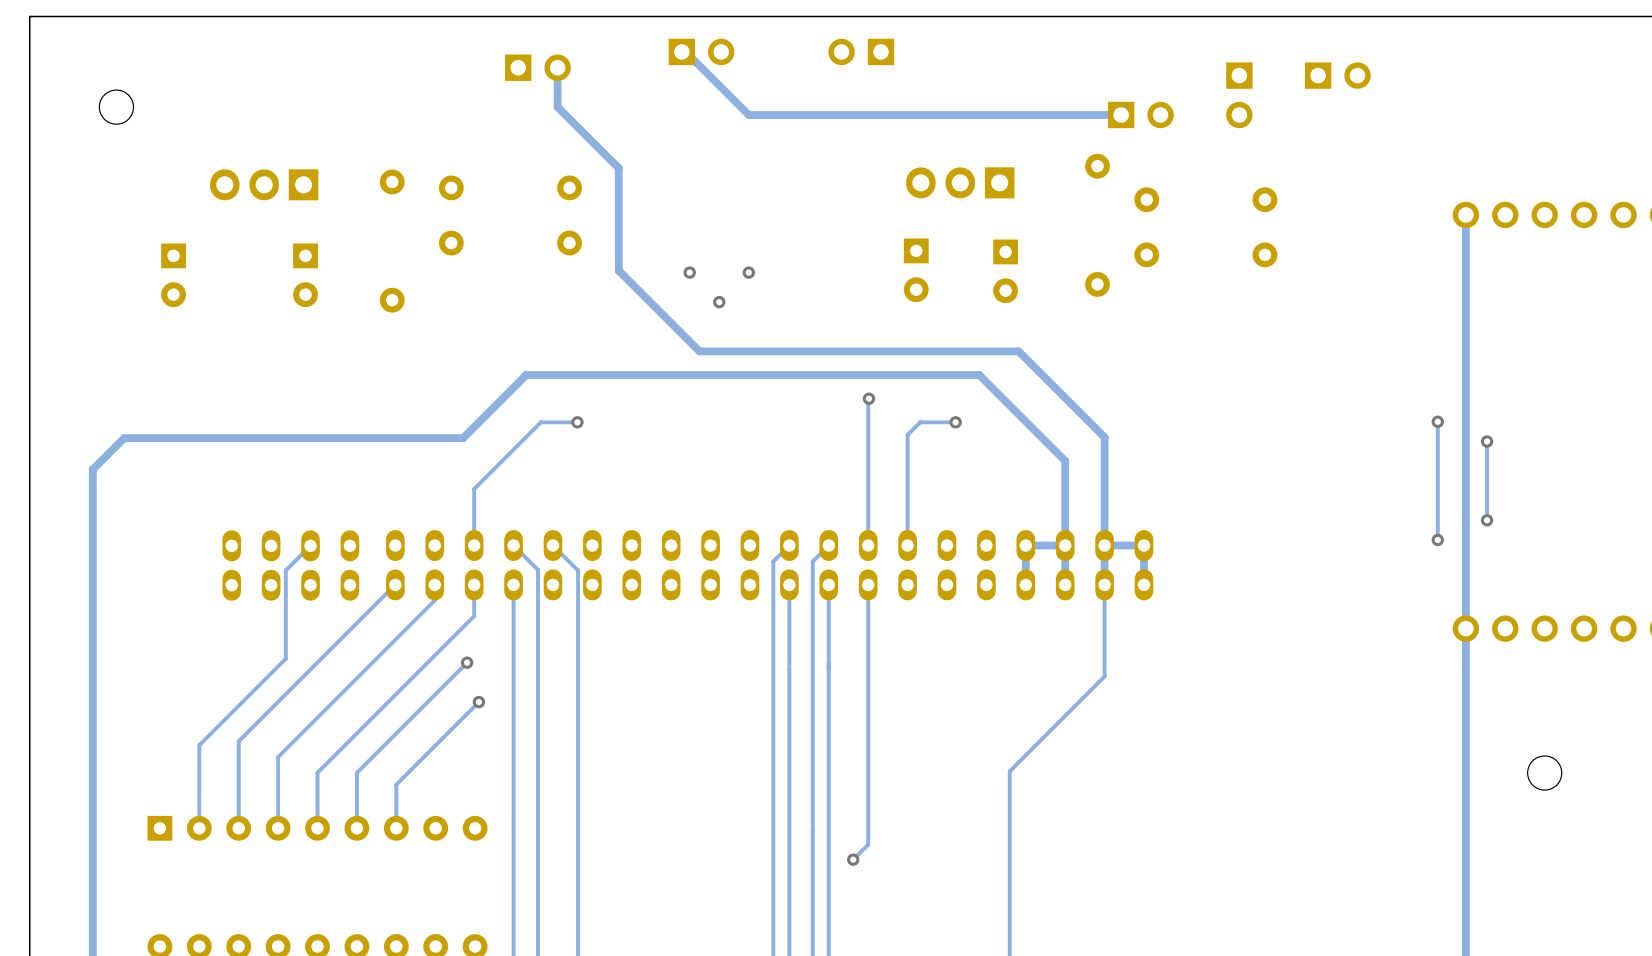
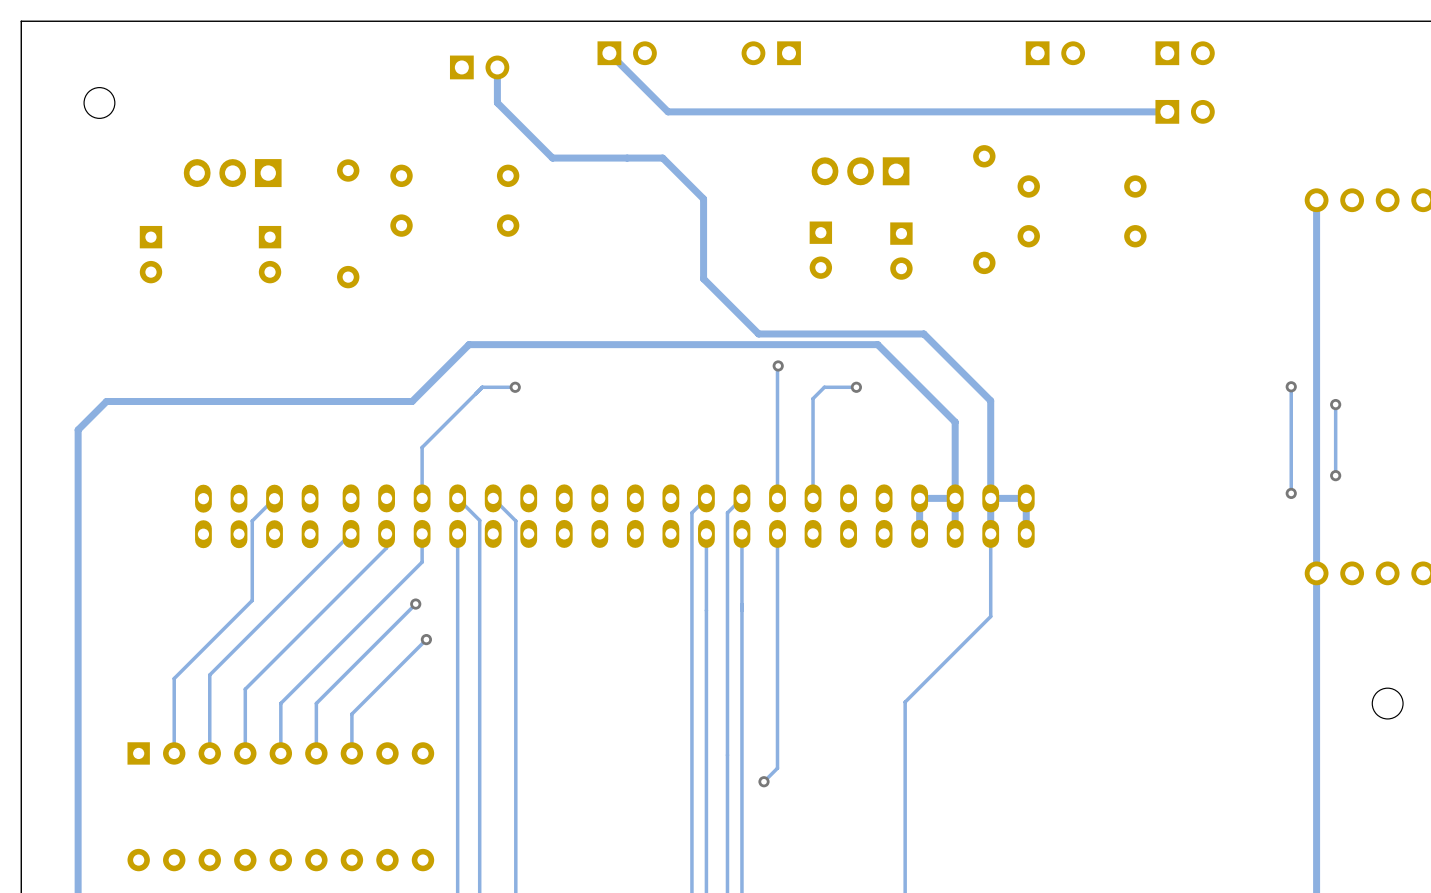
track: (681, 51) (685, 51) (748, 114) (1121, 114) -> (609, 53) (668, 111) (1167, 111)
part: none -> (1055, 53)
part: none -> (1185, 53)
part: (1337, 75) -> none
part: (1239, 95) -> none
part: (1140, 114) -> none
part: none -> (1185, 111)
track: (618, 168) (618, 270) (699, 351) (1018, 351) (1030, 363) -> (552, 158) (662, 158) (703, 198) (703, 278) (758, 333) (923, 333)
via: (689, 272) -> none
via: (748, 272) -> none
via: (719, 302) -> none

